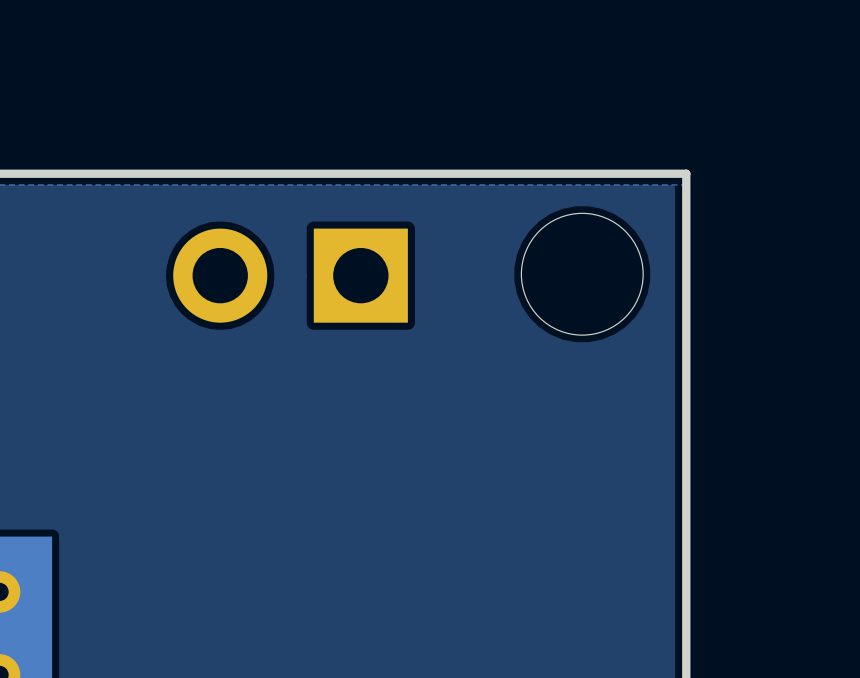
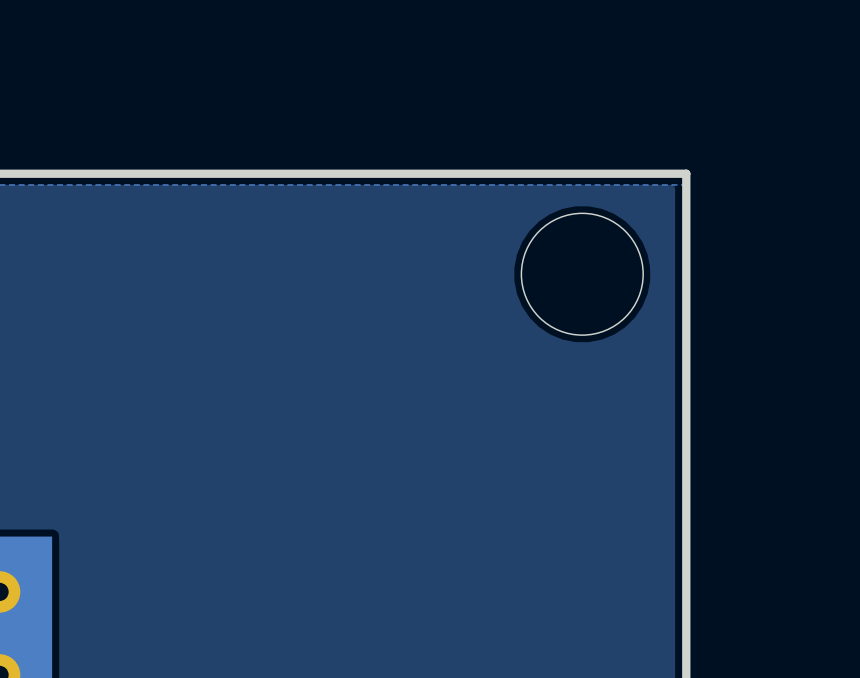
part: (290, 275) -> none

